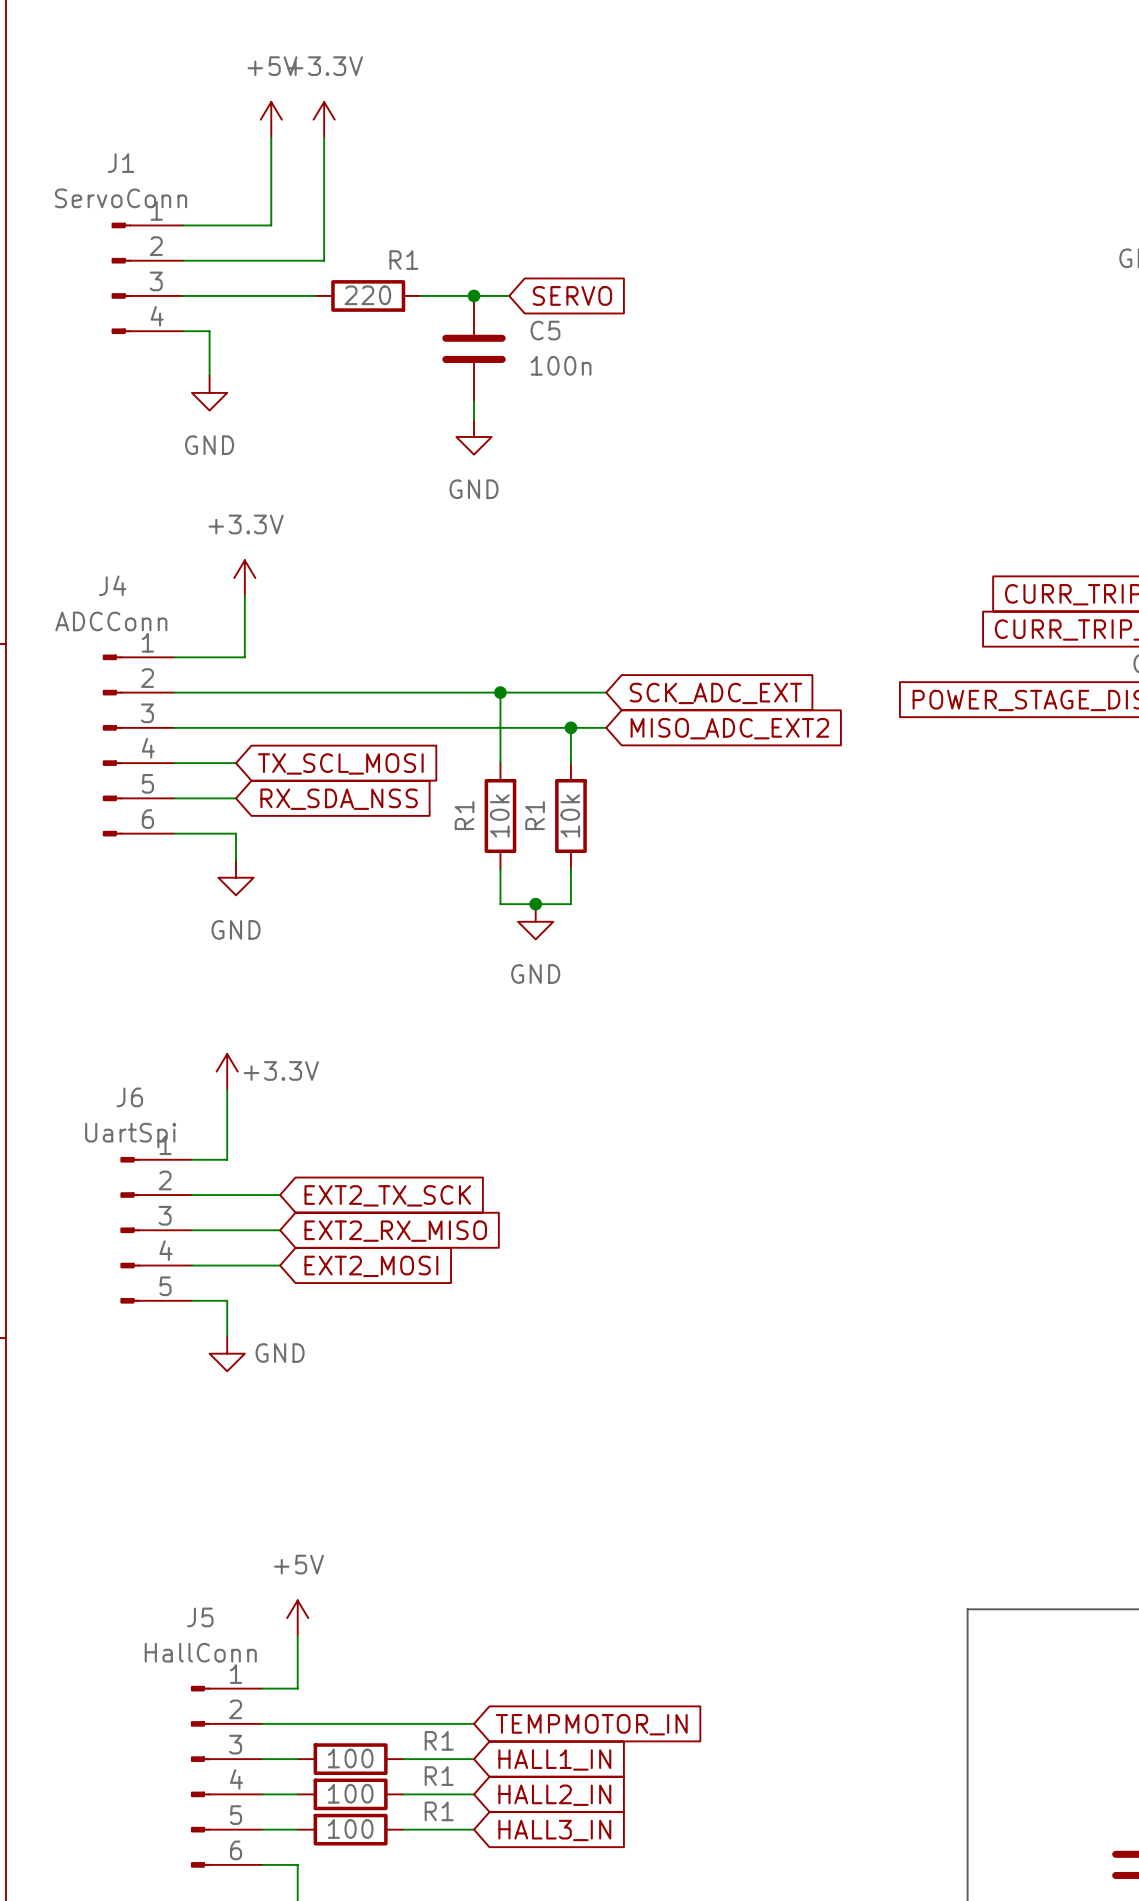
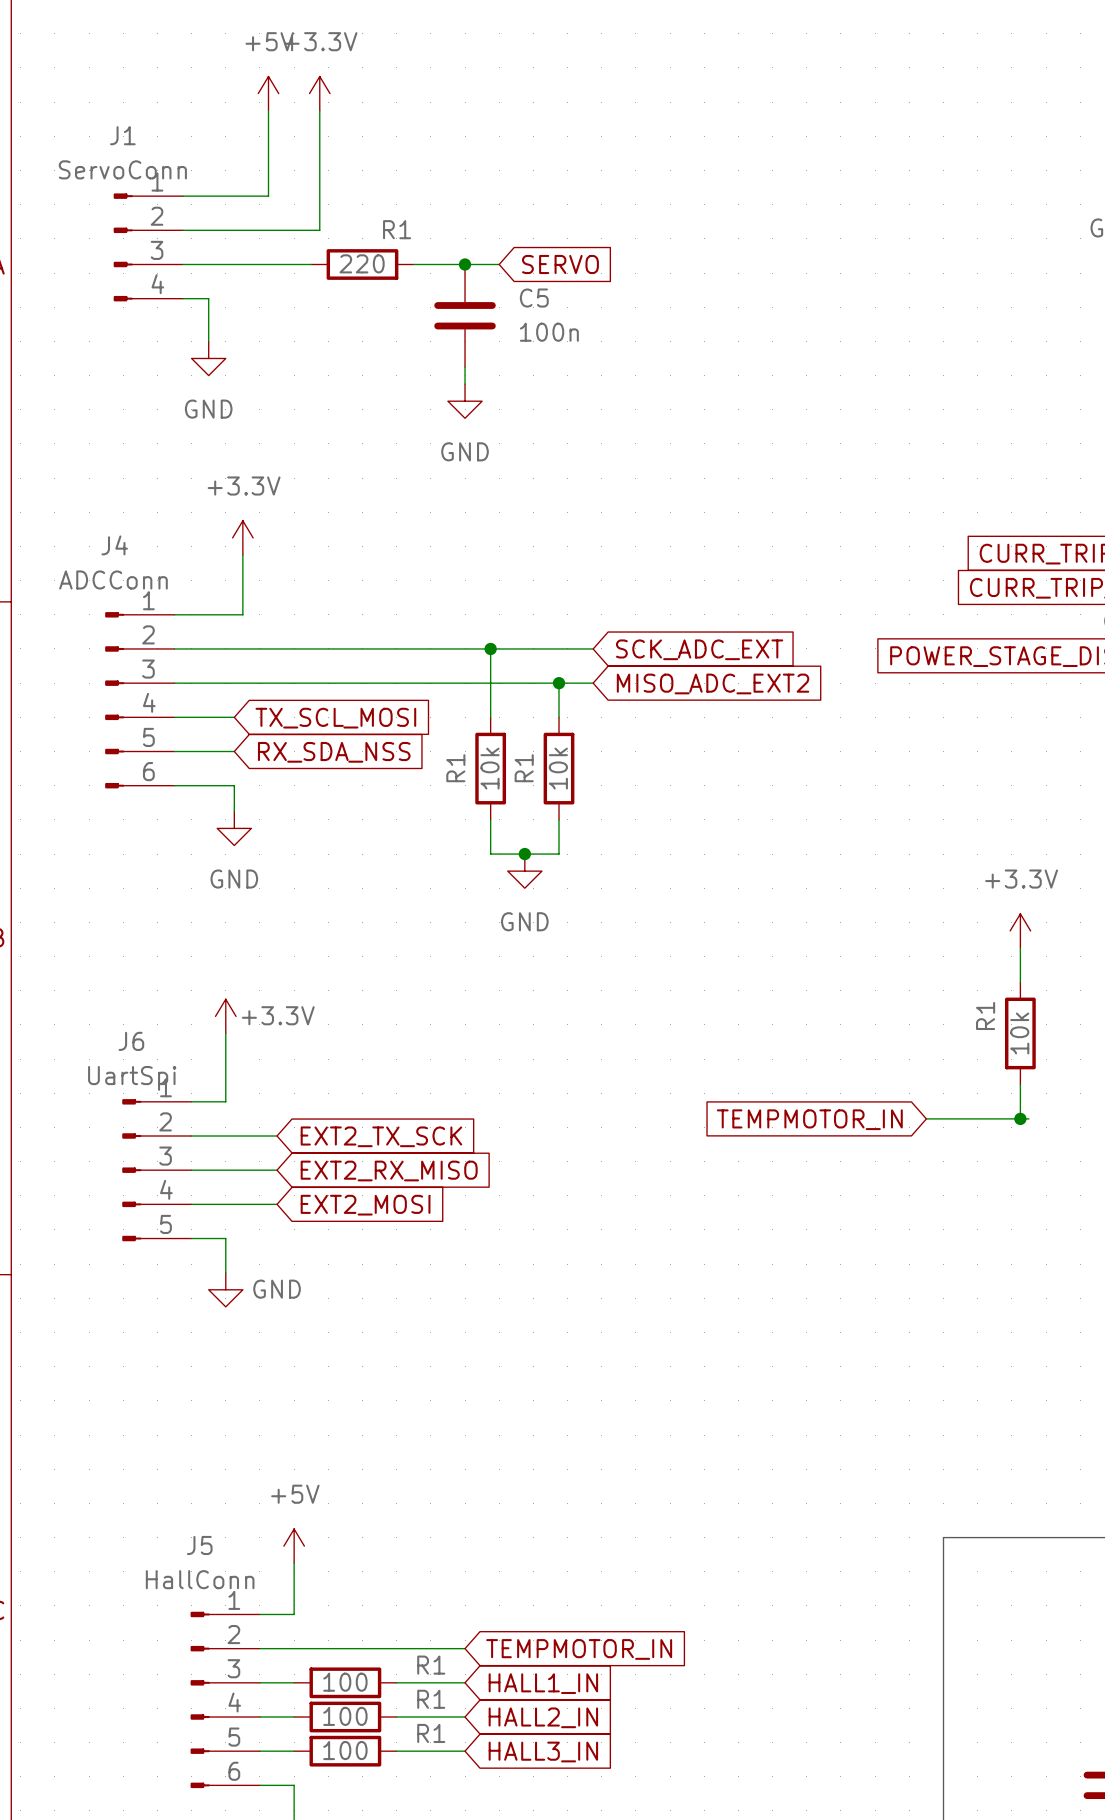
power symbol: none -> +3.3V (1020, 930)
wire: none -> (1020, 948) (1020, 982)
R1: none -> 10k (1020, 1033)
wire: none -> (1020, 1084) (1020, 1118)
wire: none -> (926, 1118) (1028, 1118)
junction: none -> (1020, 1118)
global label: none -> TEMPMOTOR_IN (809, 1119)

